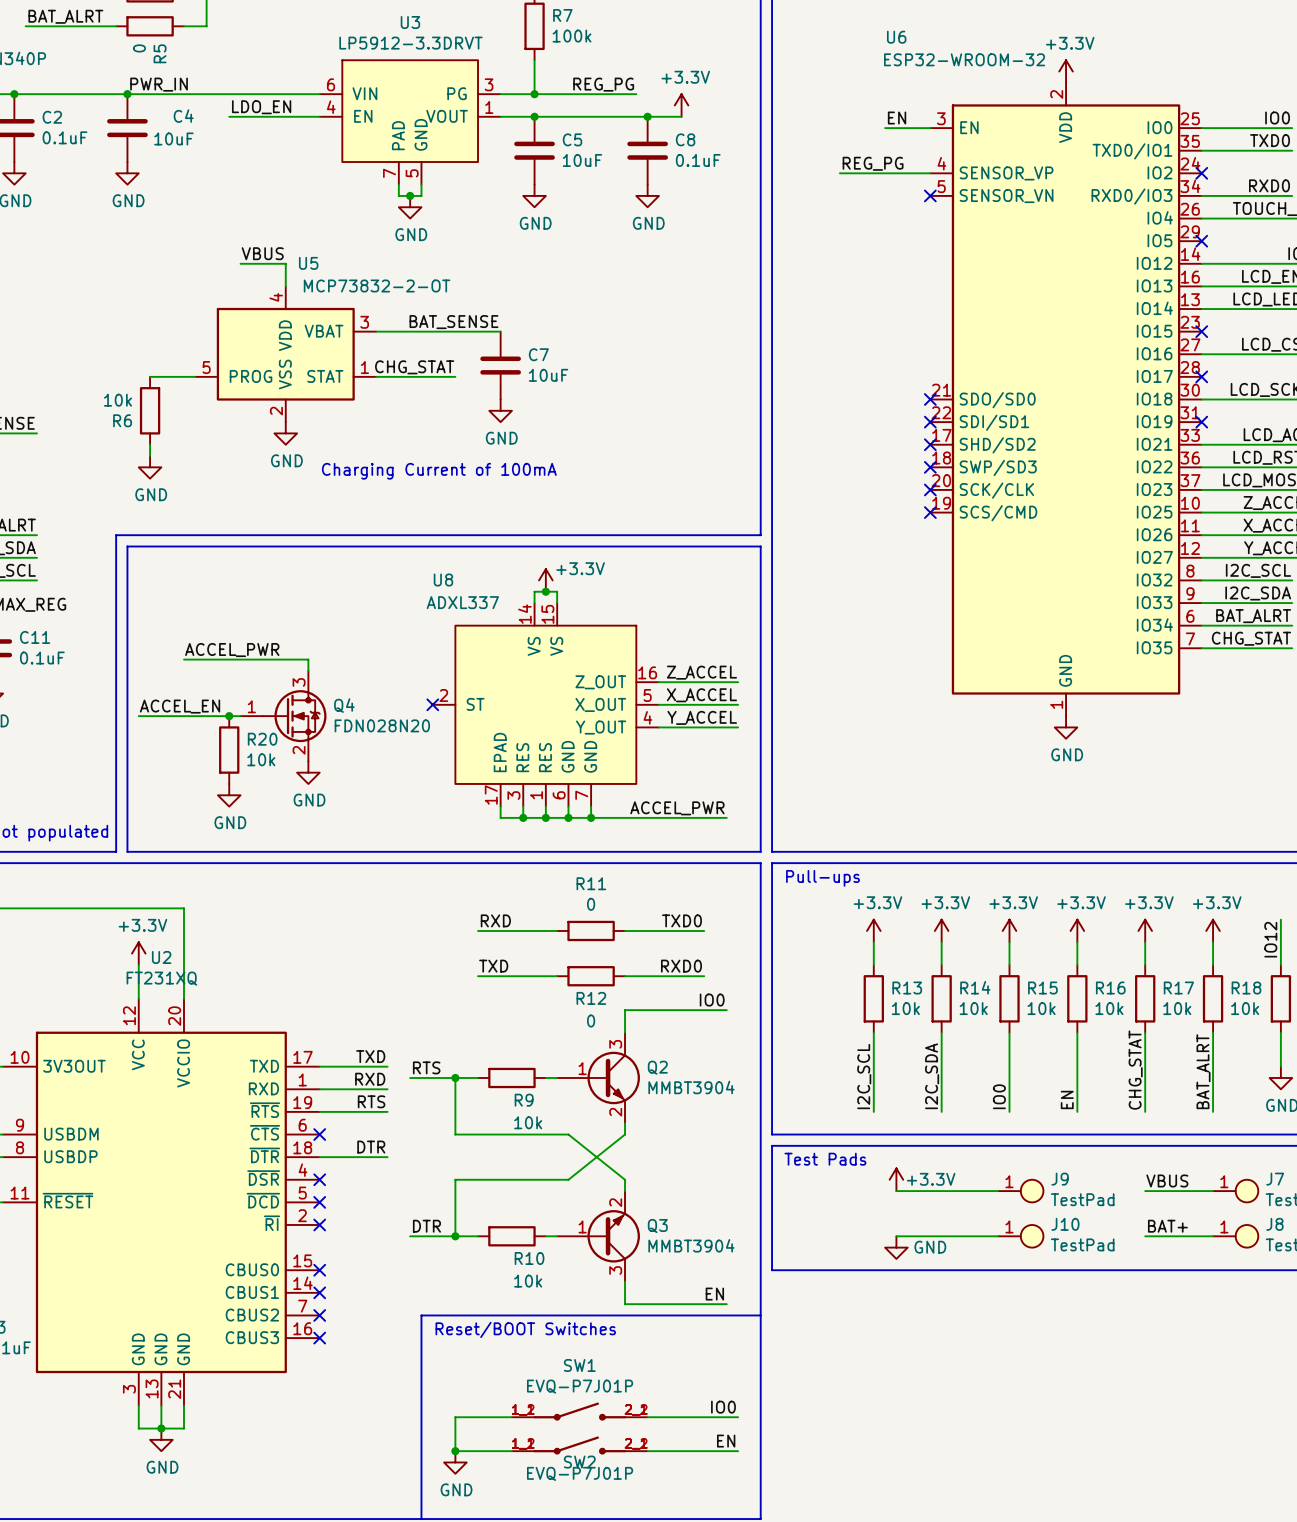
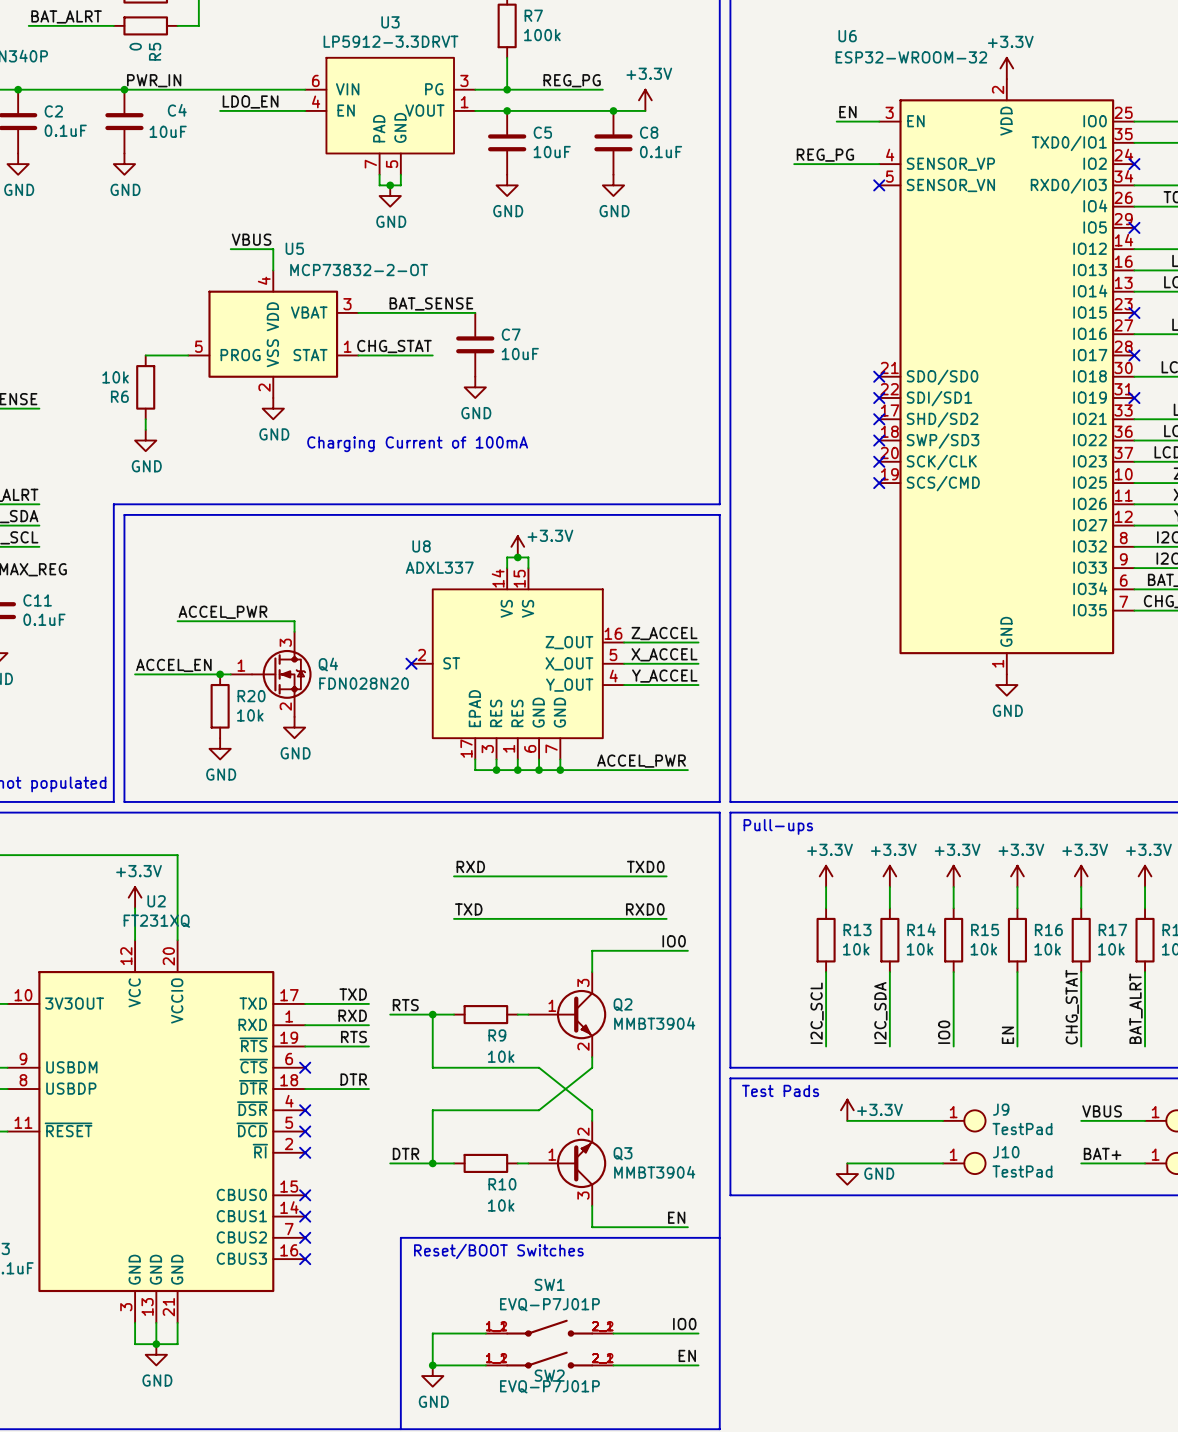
wire: none -> (528, 876) (592, 876)
R11: 0 (591, 930) -> none
wire: none -> (528, 918) (592, 918)
R12: 0 (591, 976) -> none

